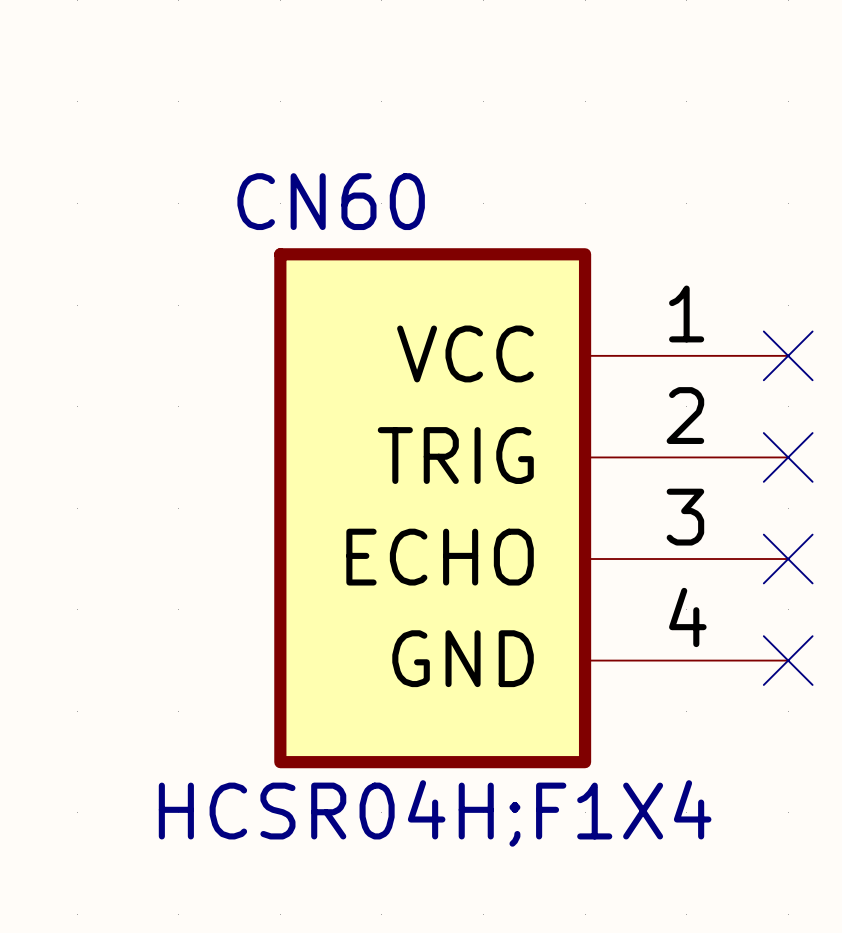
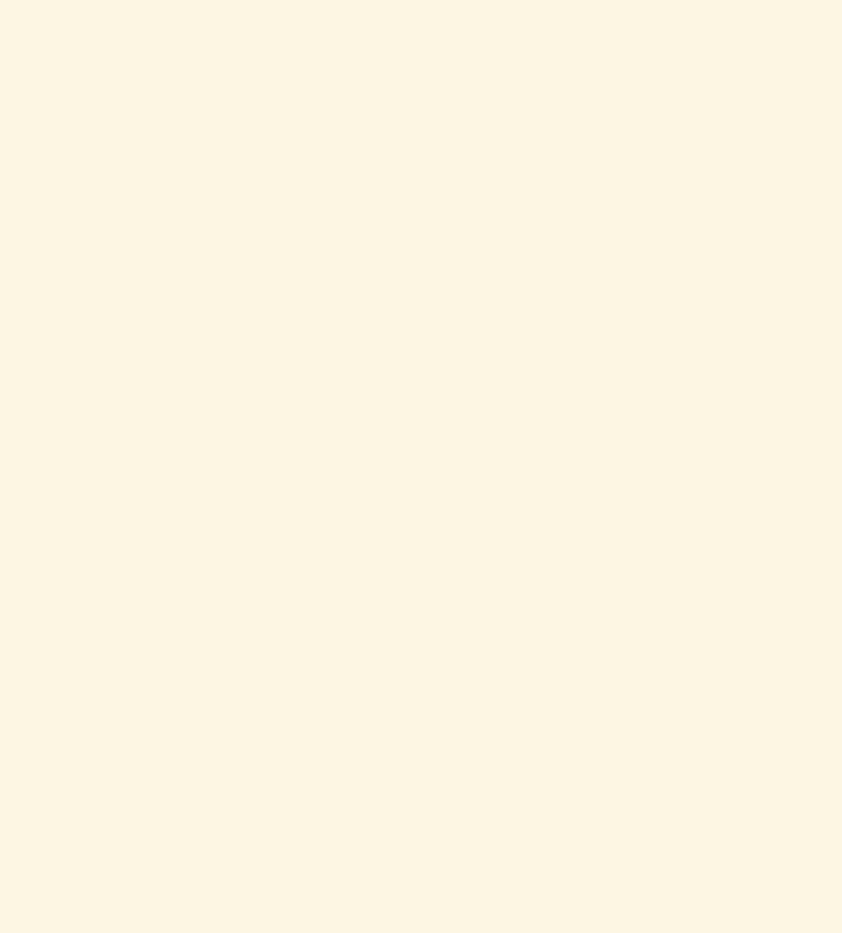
no-connect mark: (788, 355) -> none
no-connect mark: (788, 457) -> none
CN60: HCSR04H;F1X4 (531, 508) -> none
no-connect mark: (788, 559) -> none
no-connect mark: (788, 660) -> none

